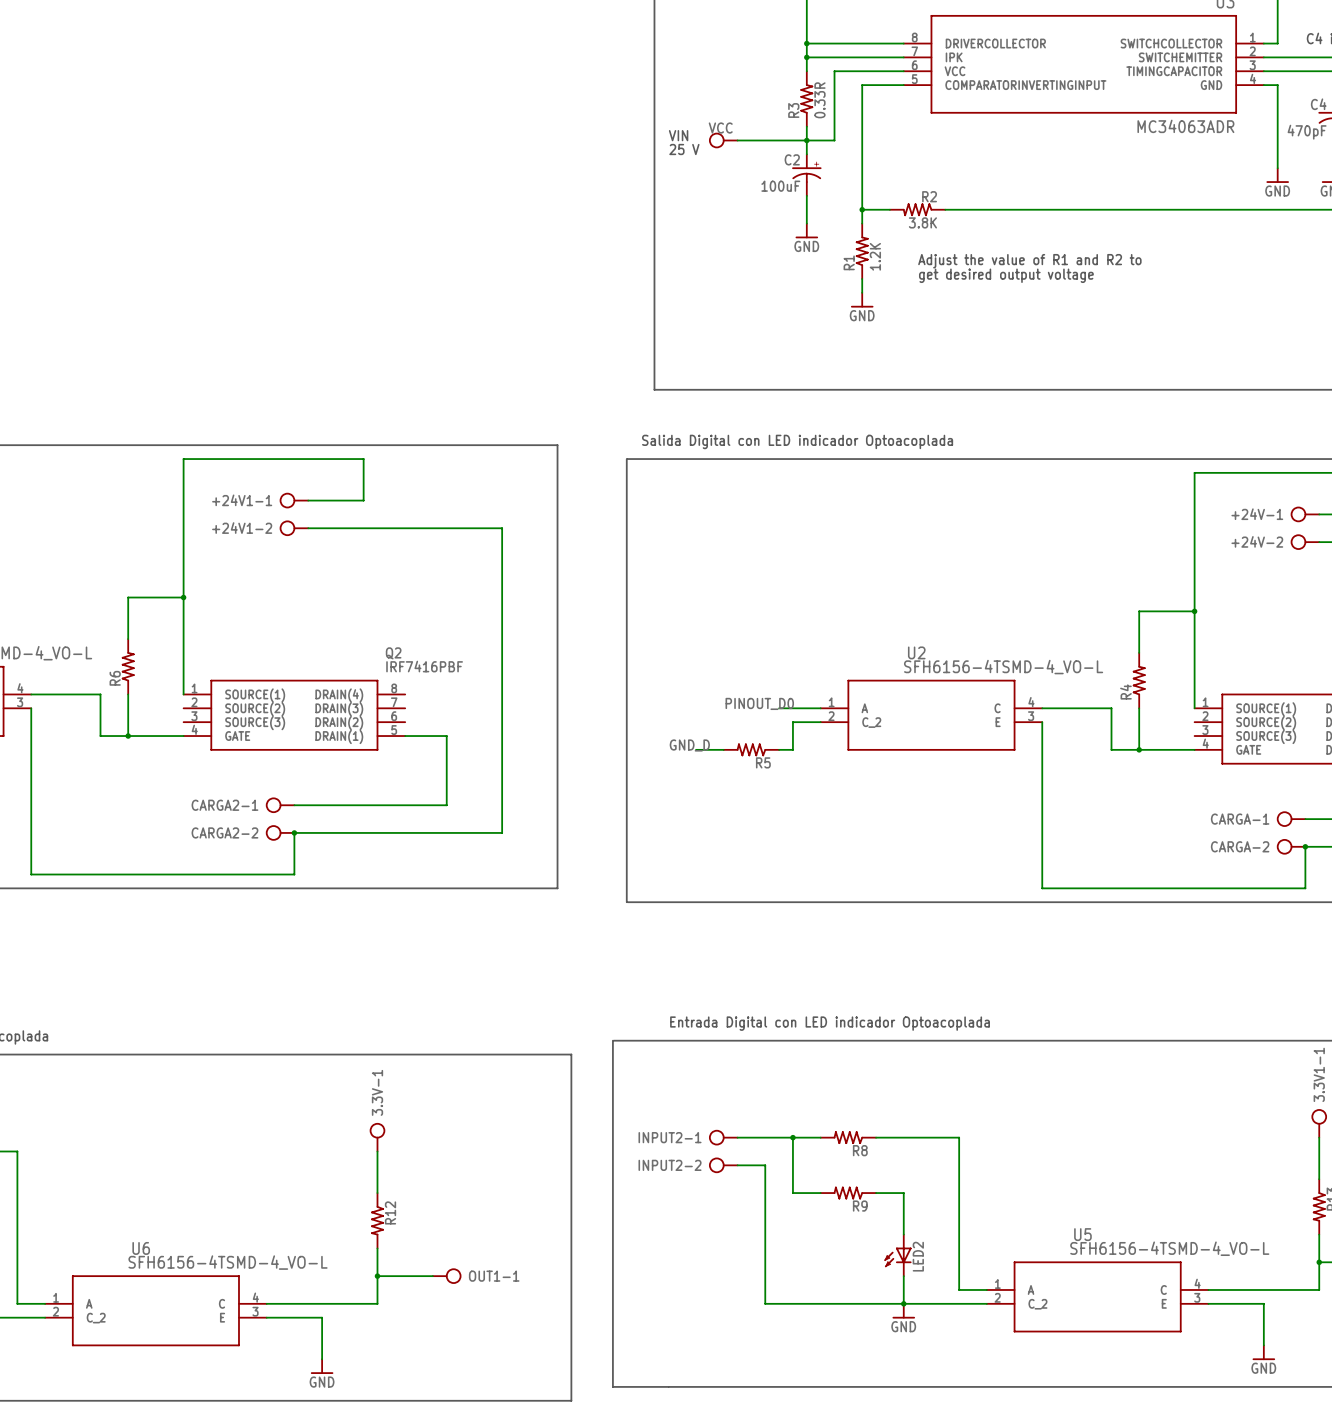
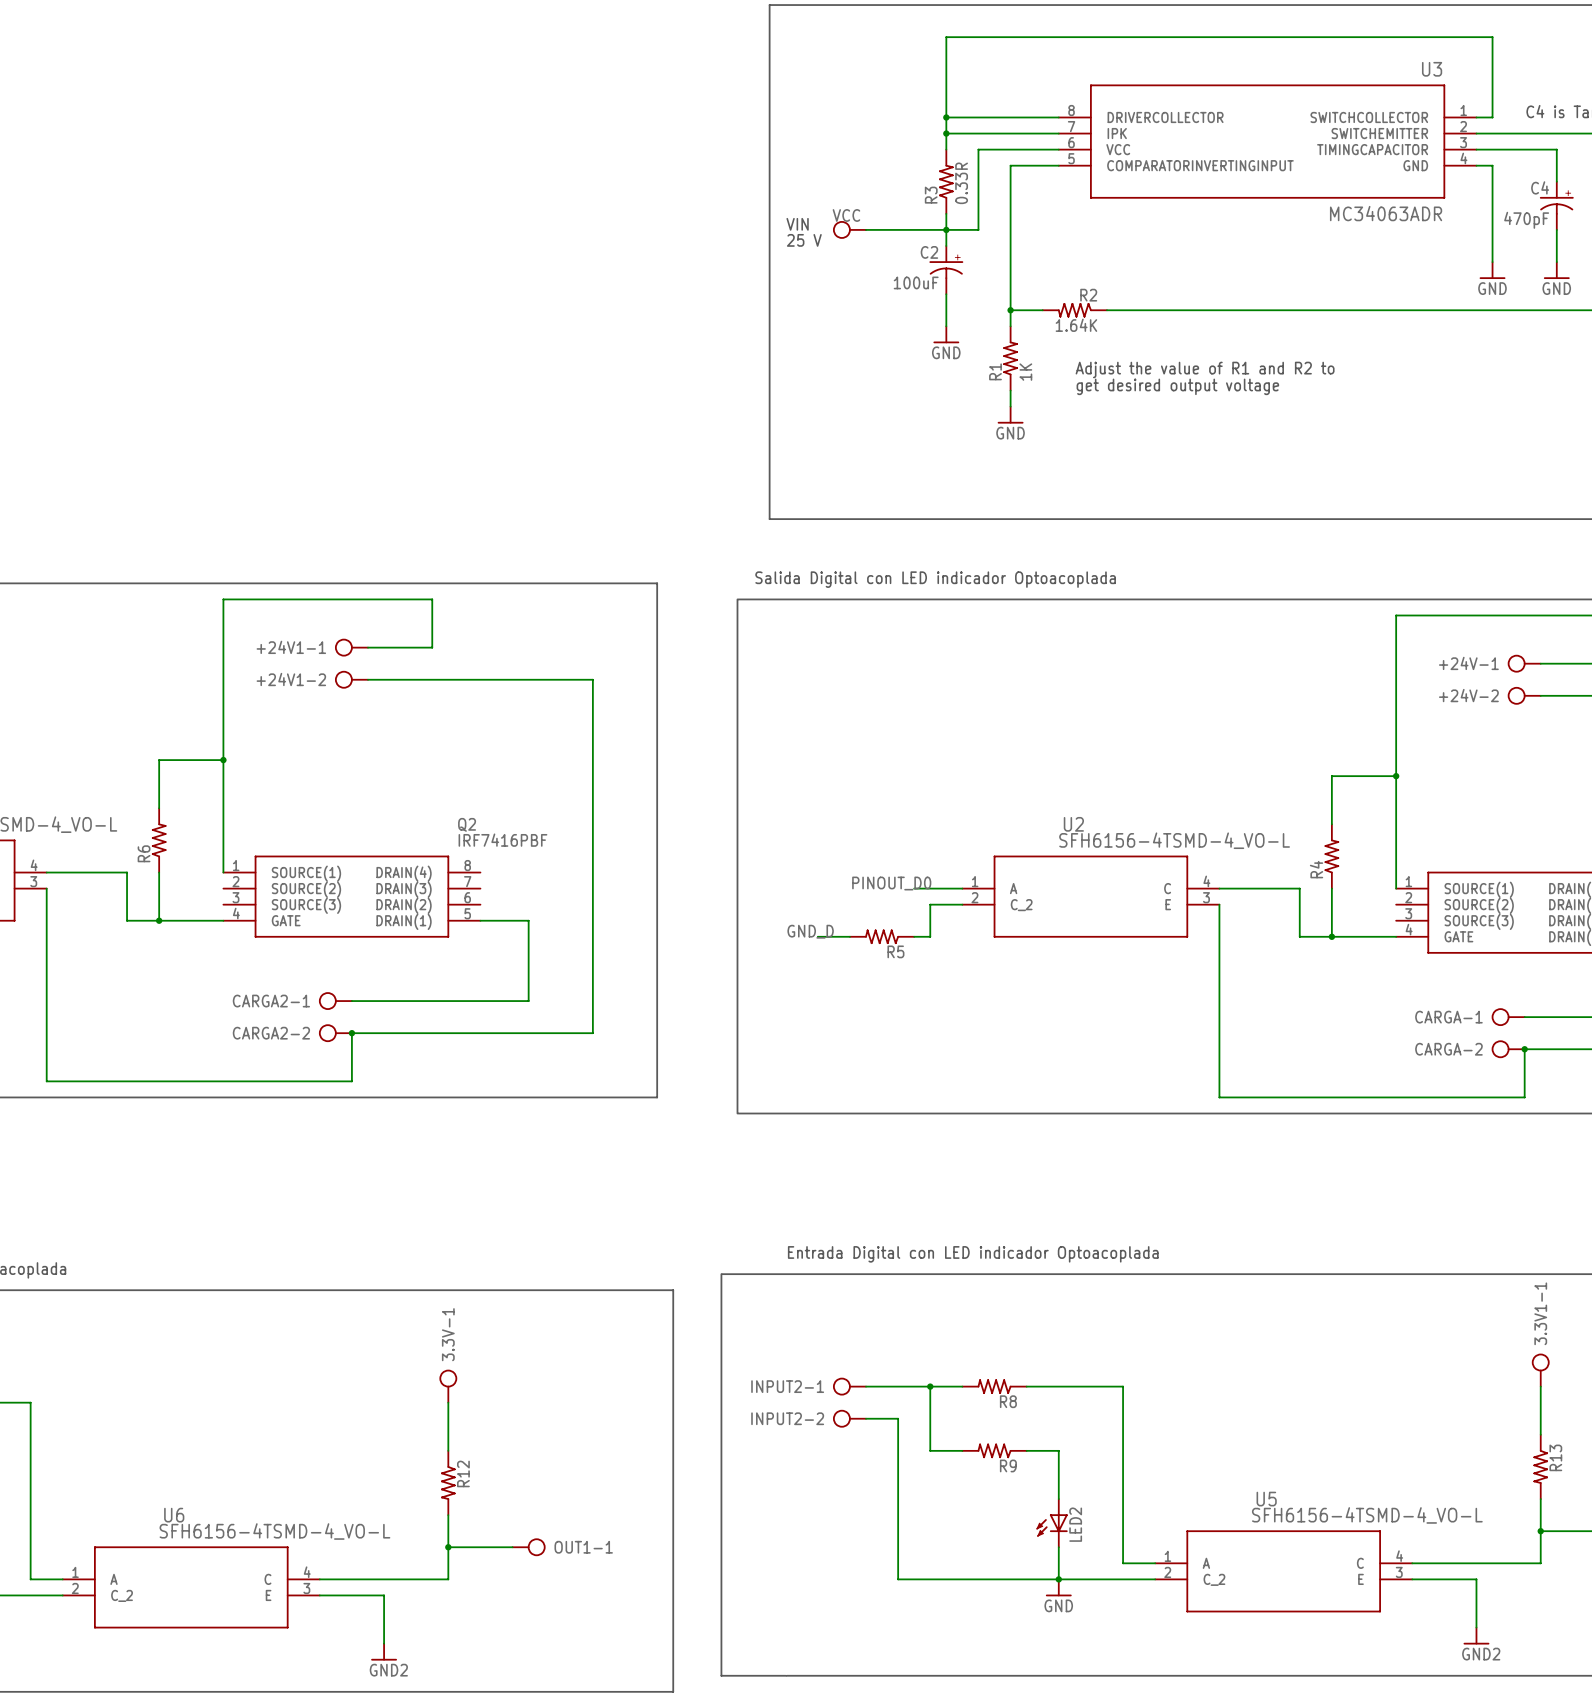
R2 value: 3.8K (922, 222) -> 1.64K (1076, 325)
R1 value: 1.2K (875, 256) -> 1K (1025, 372)
power symbol: GND (1263, 1352) -> GND2 (1476, 1636)
power symbol: GND (322, 1366) -> GND2 (384, 1652)

